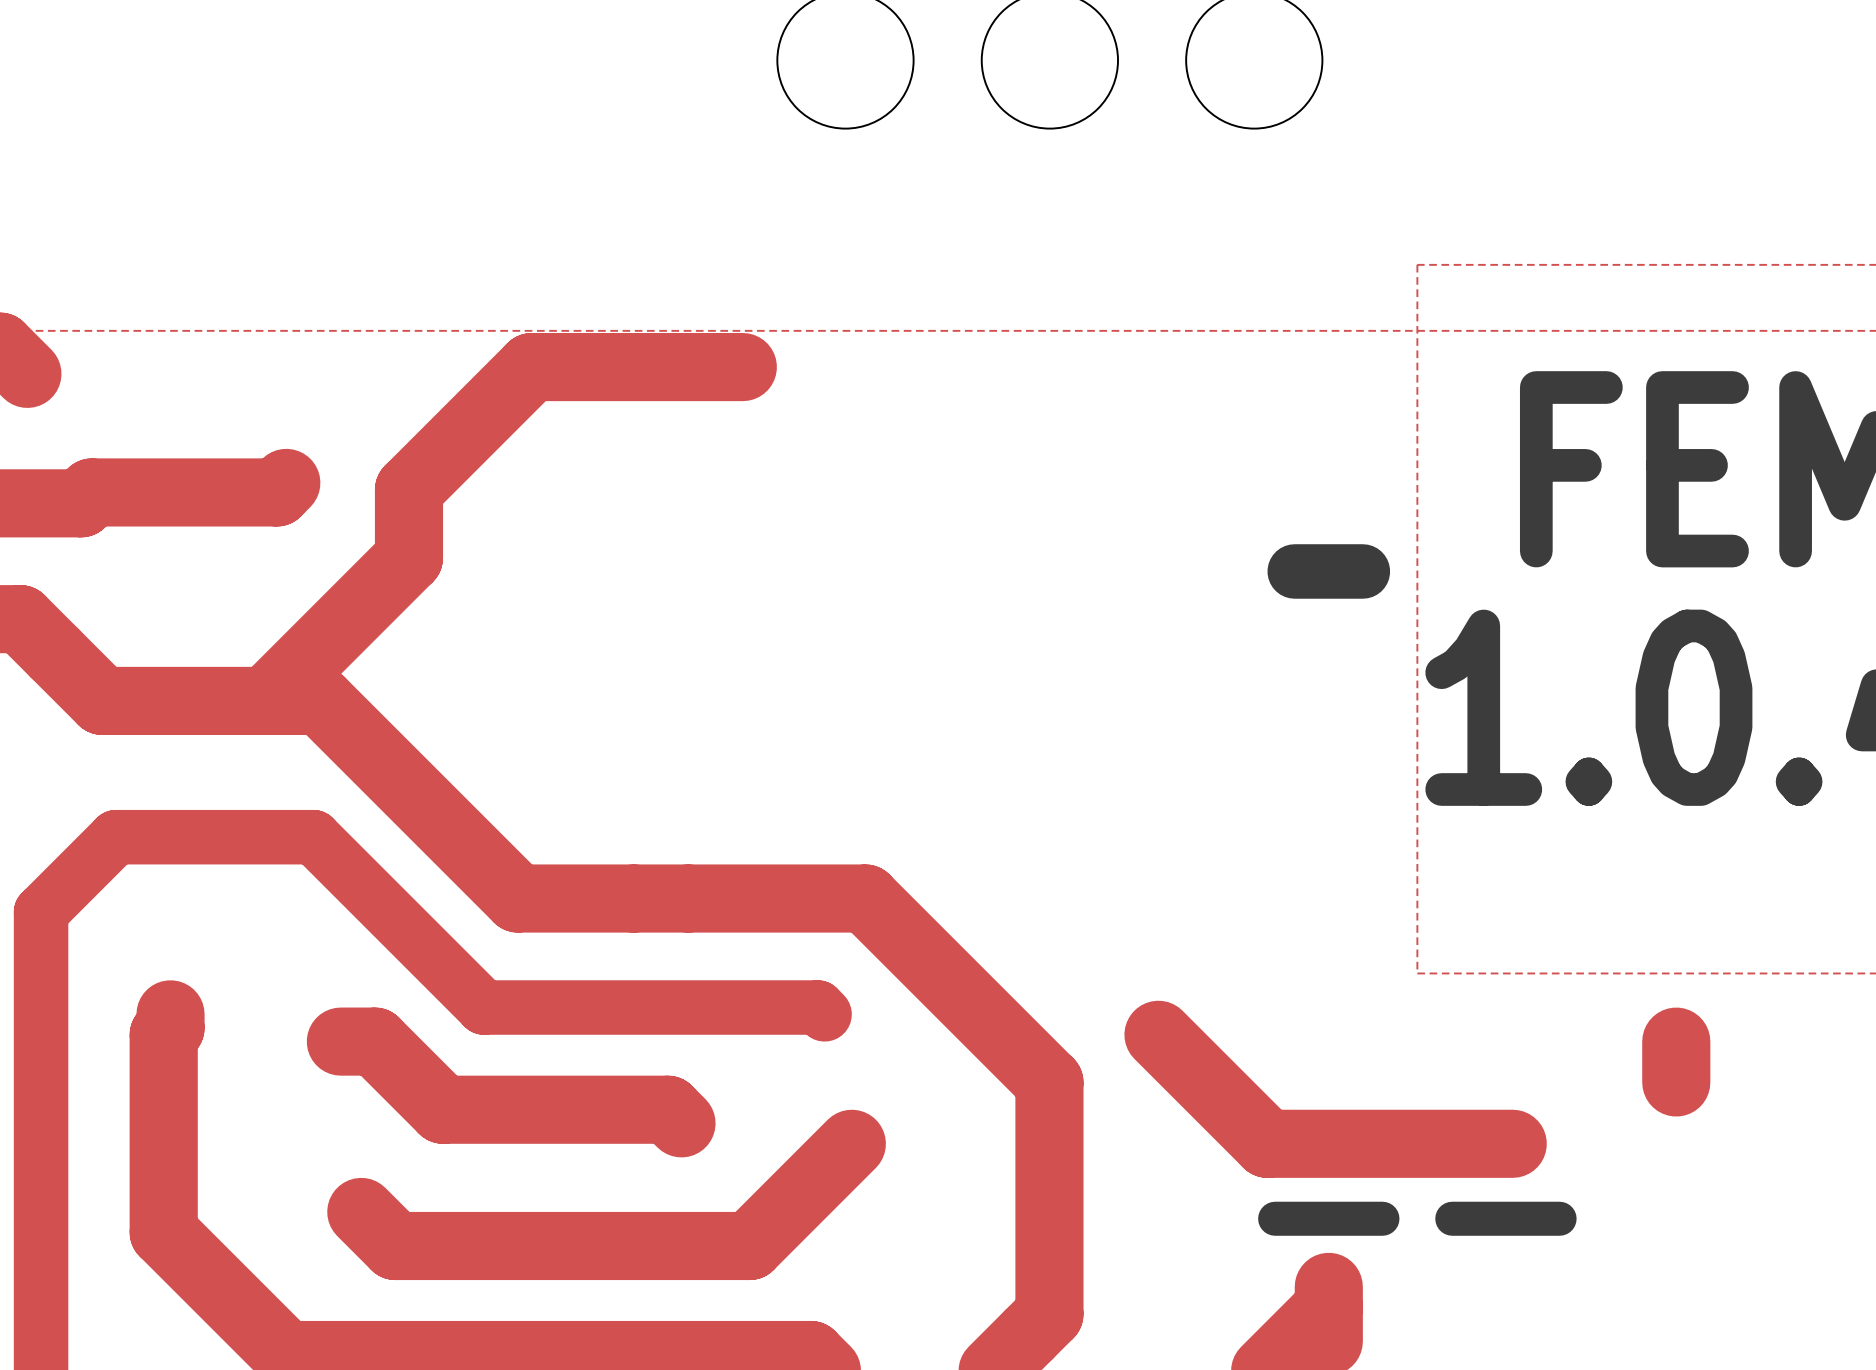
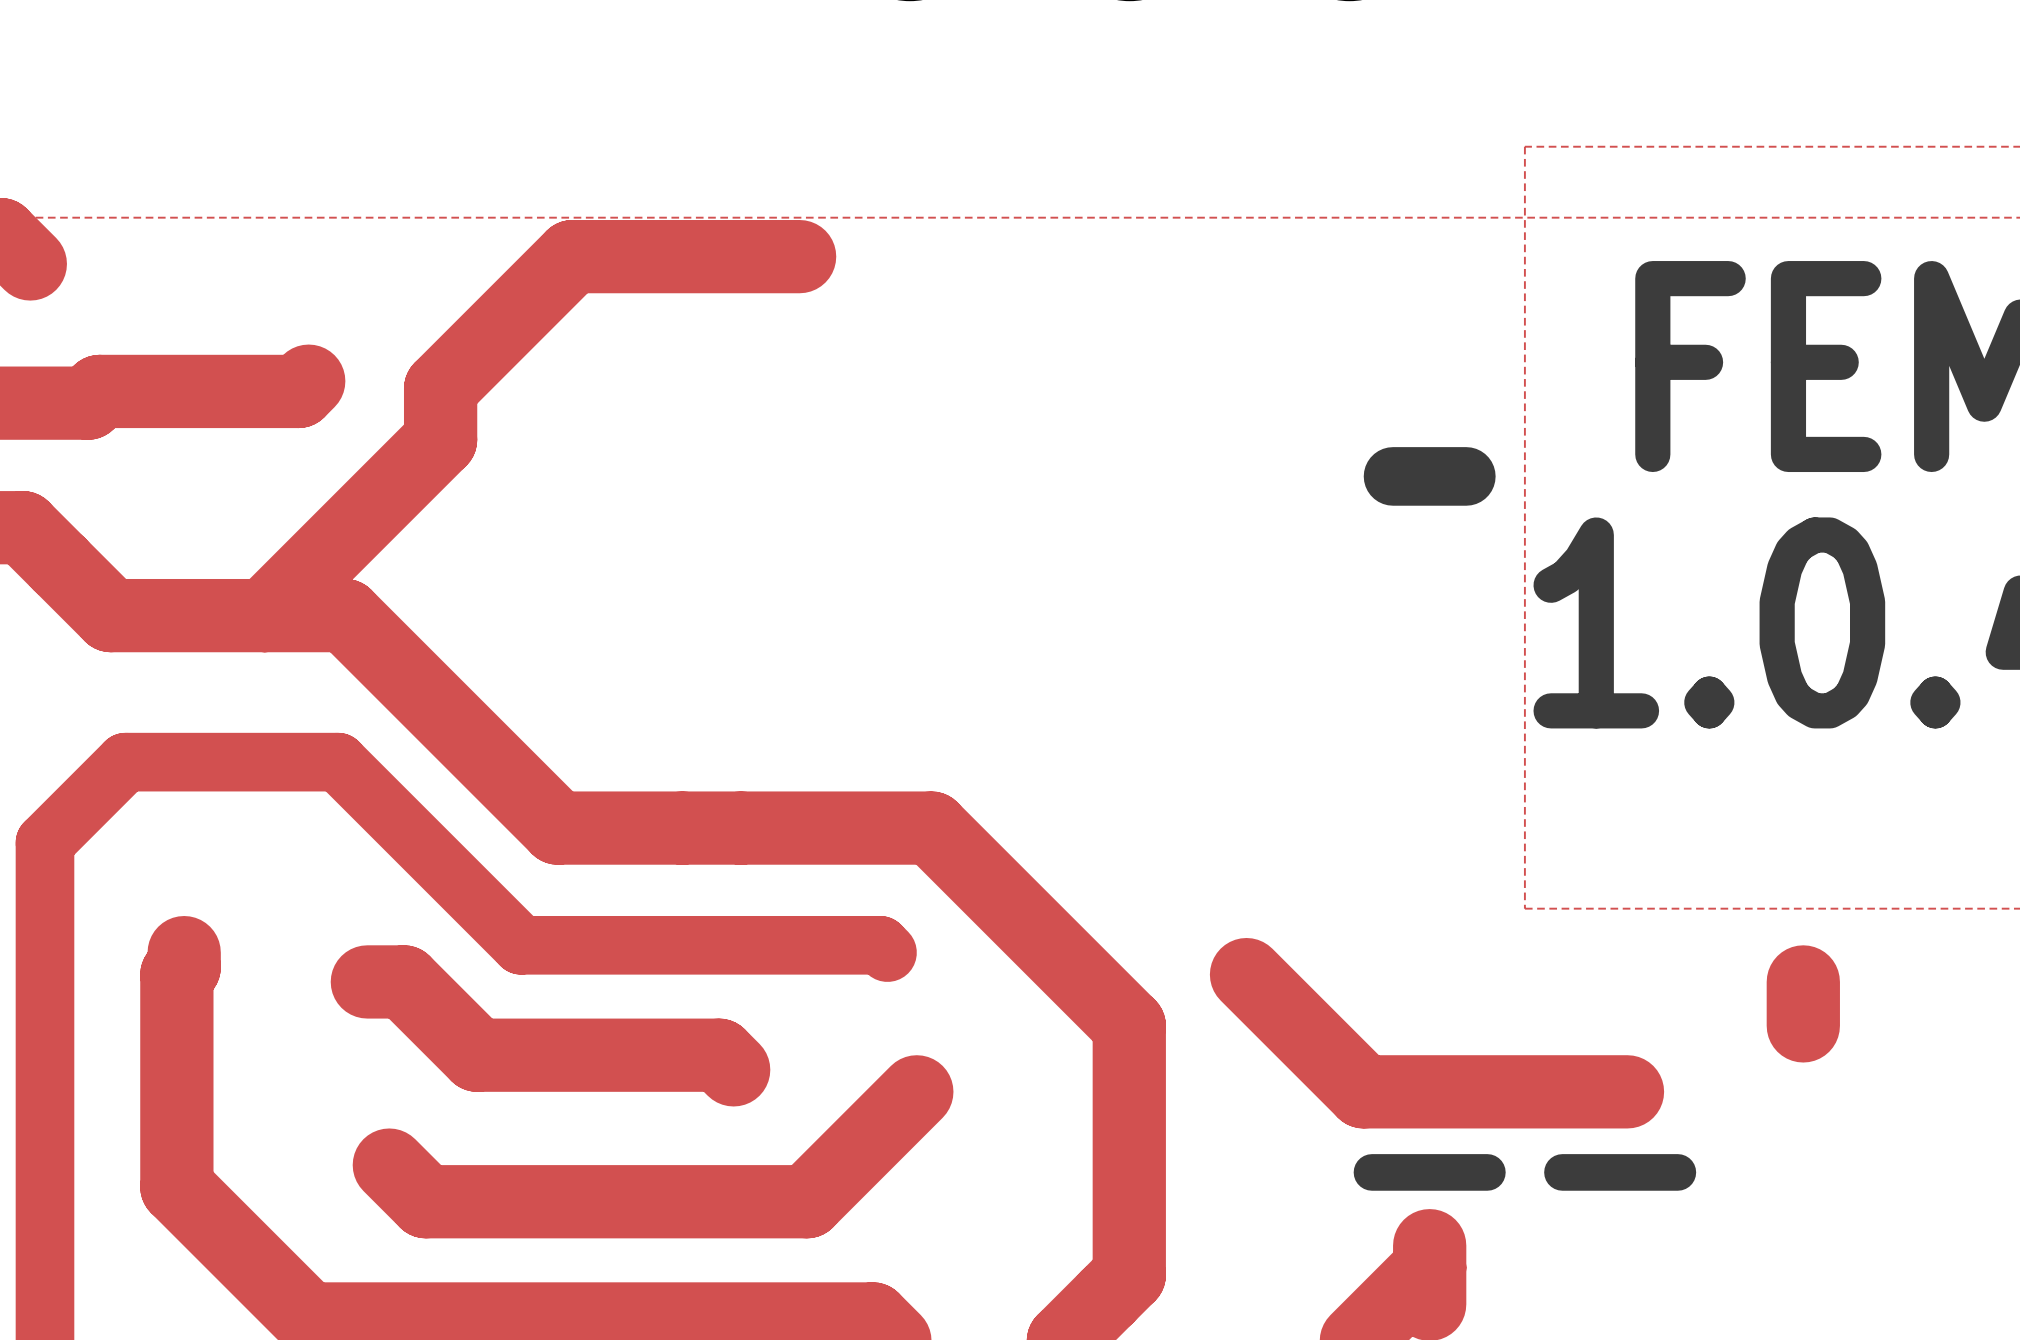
track: (408, 537) (408, 557) (265, 700) -> (440, 439) (264, 615)

